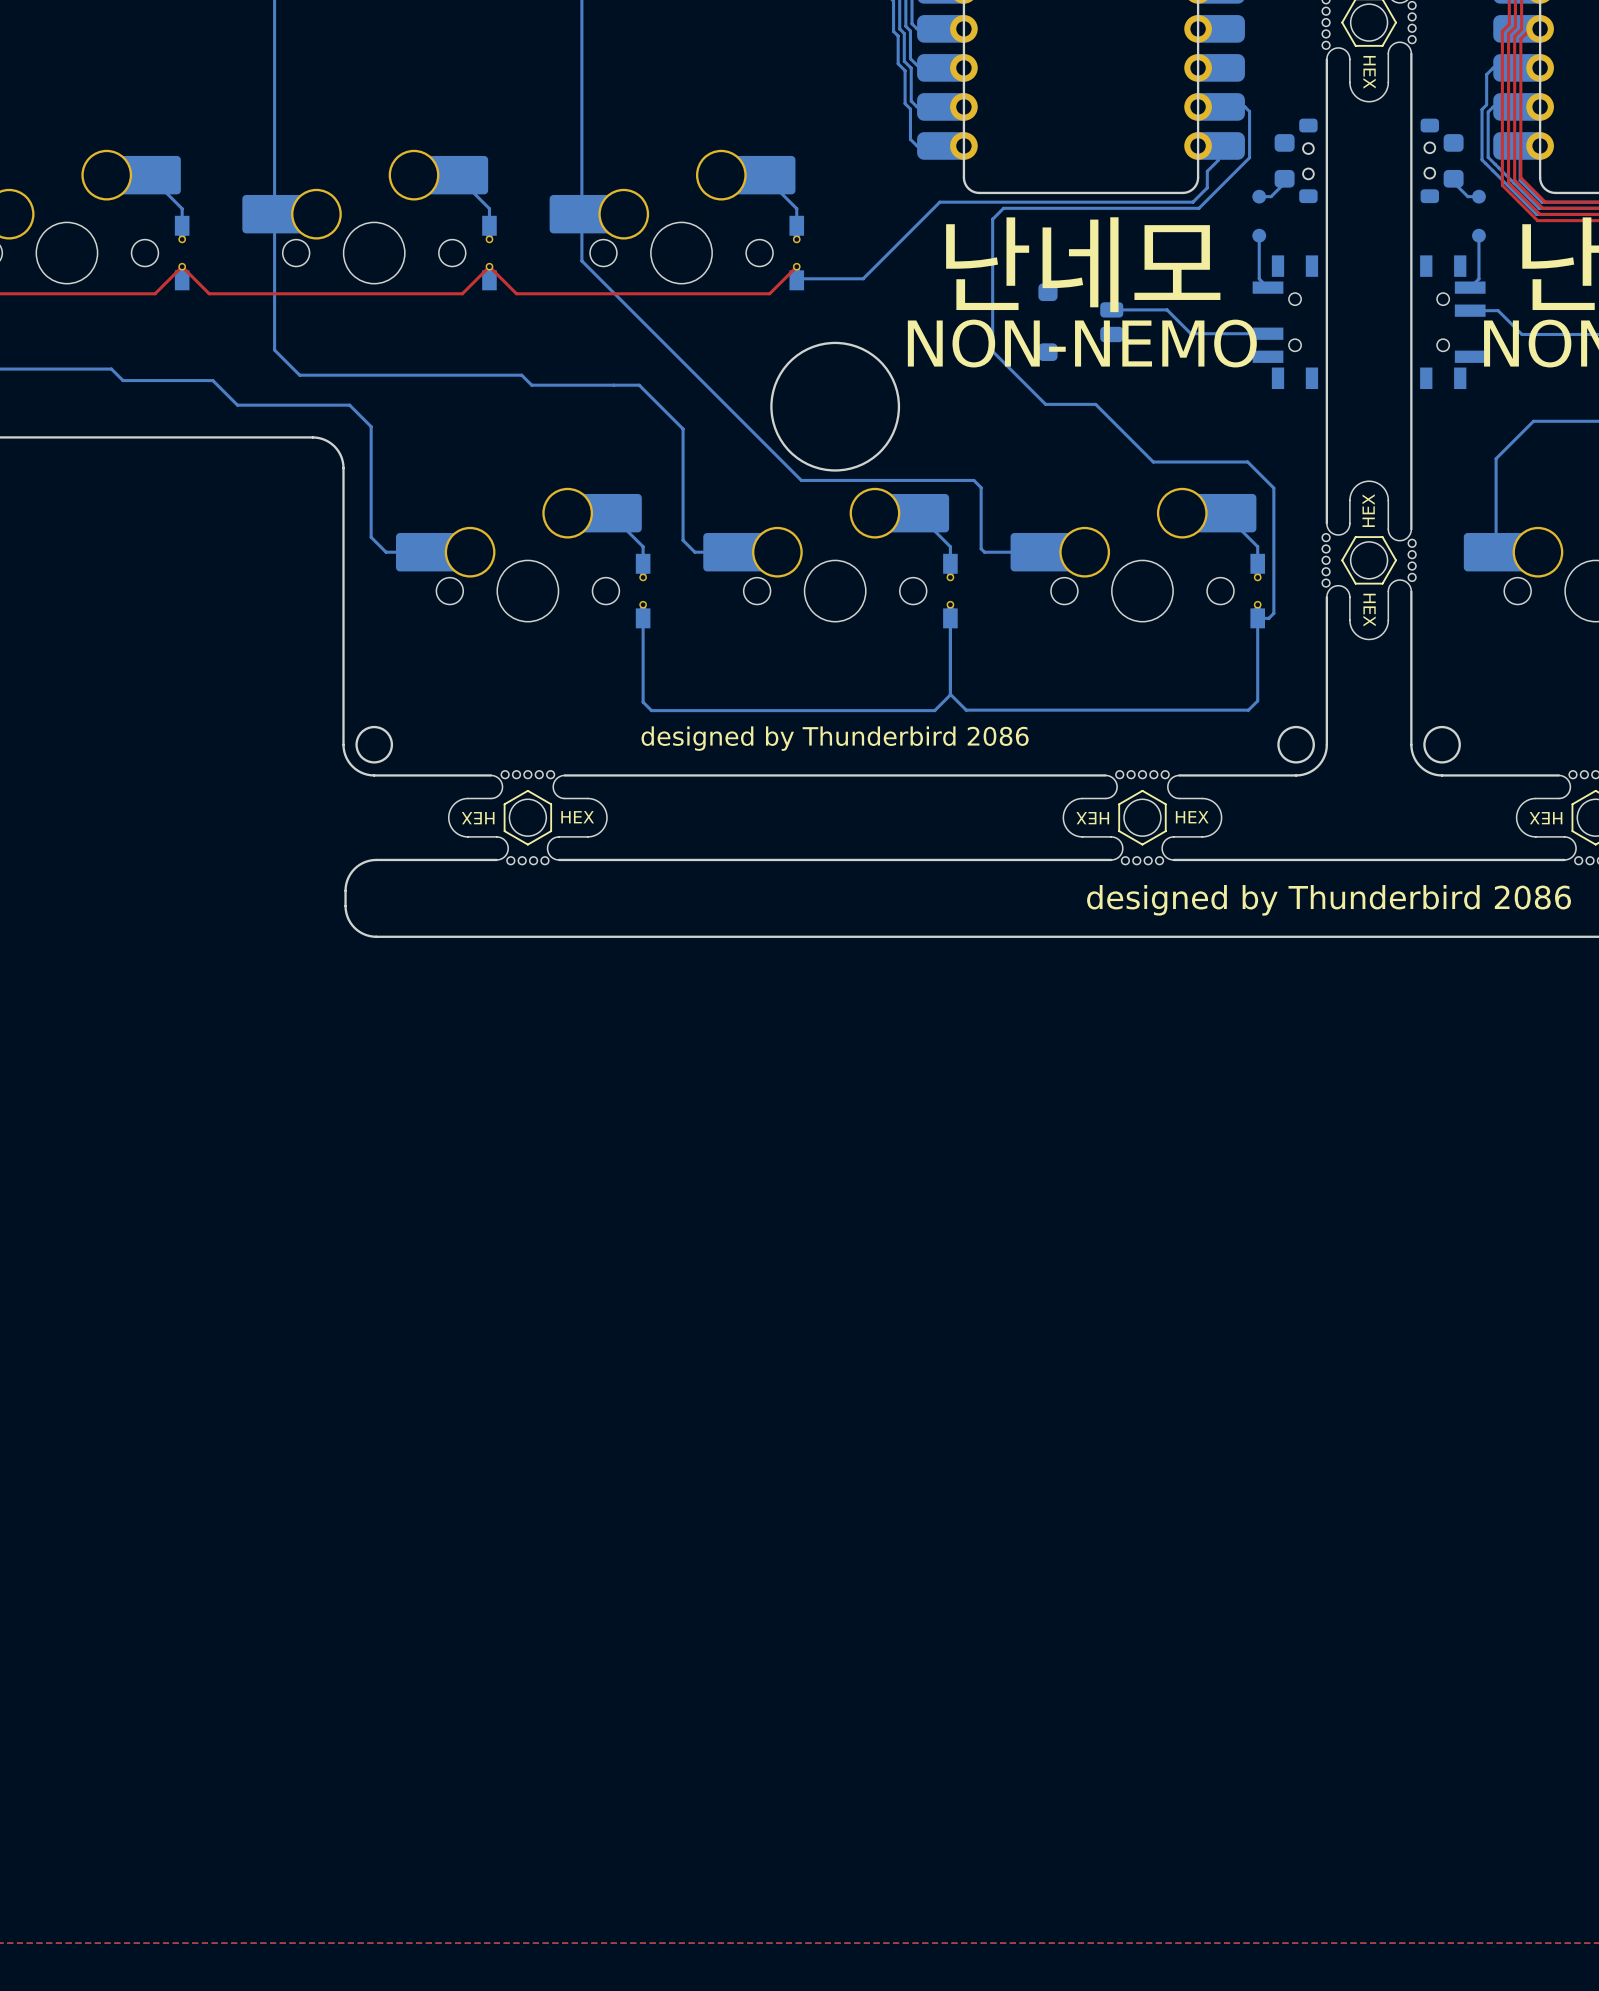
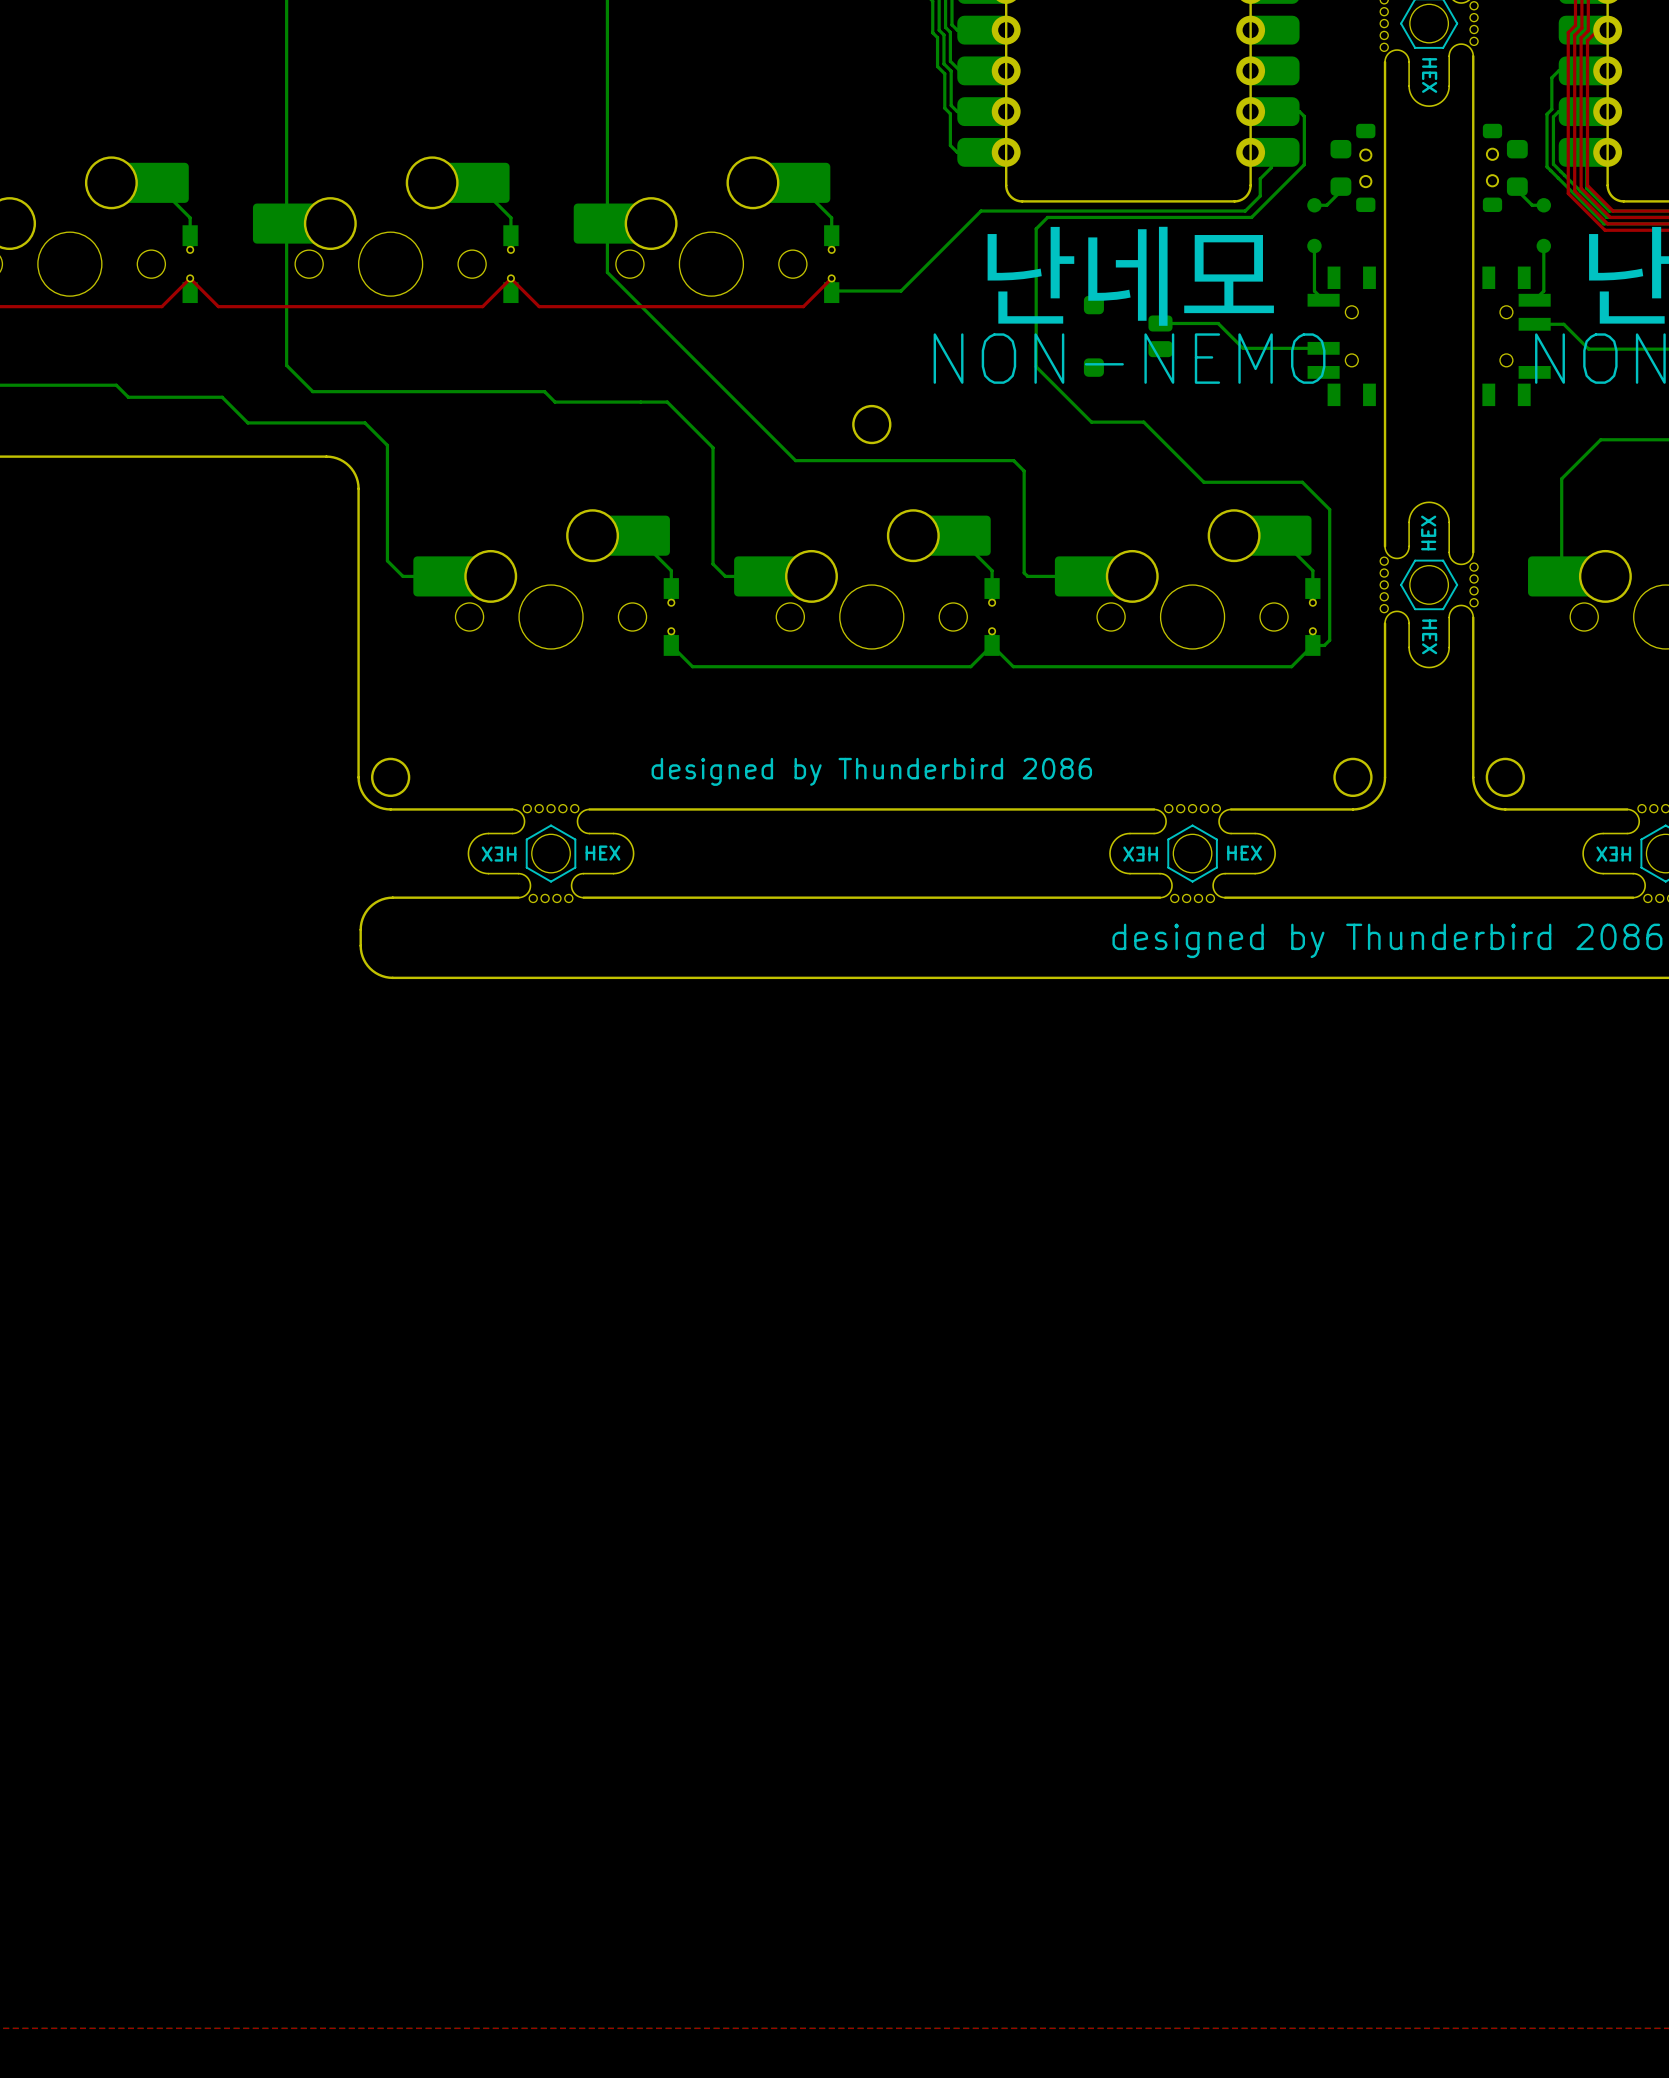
round board edge size: [770, 341, 901, 472] -> [852, 404, 892, 445]
bottom track: (762, 441) (801, 480) (973, 480) (981, 487) -> (795, 460) (1013, 460) (1024, 471) (1024, 509)
bottom track: (643, 618) (643, 702) (651, 710) (934, 710) (950, 694) (950, 618) -> (671, 645) (692, 666) (970, 666) (992, 645) (1013, 666) (1291, 666) (1312, 645)
bottom track: (1257, 618) (1257, 700) (1248, 710) (966, 710) (950, 694) -> none

